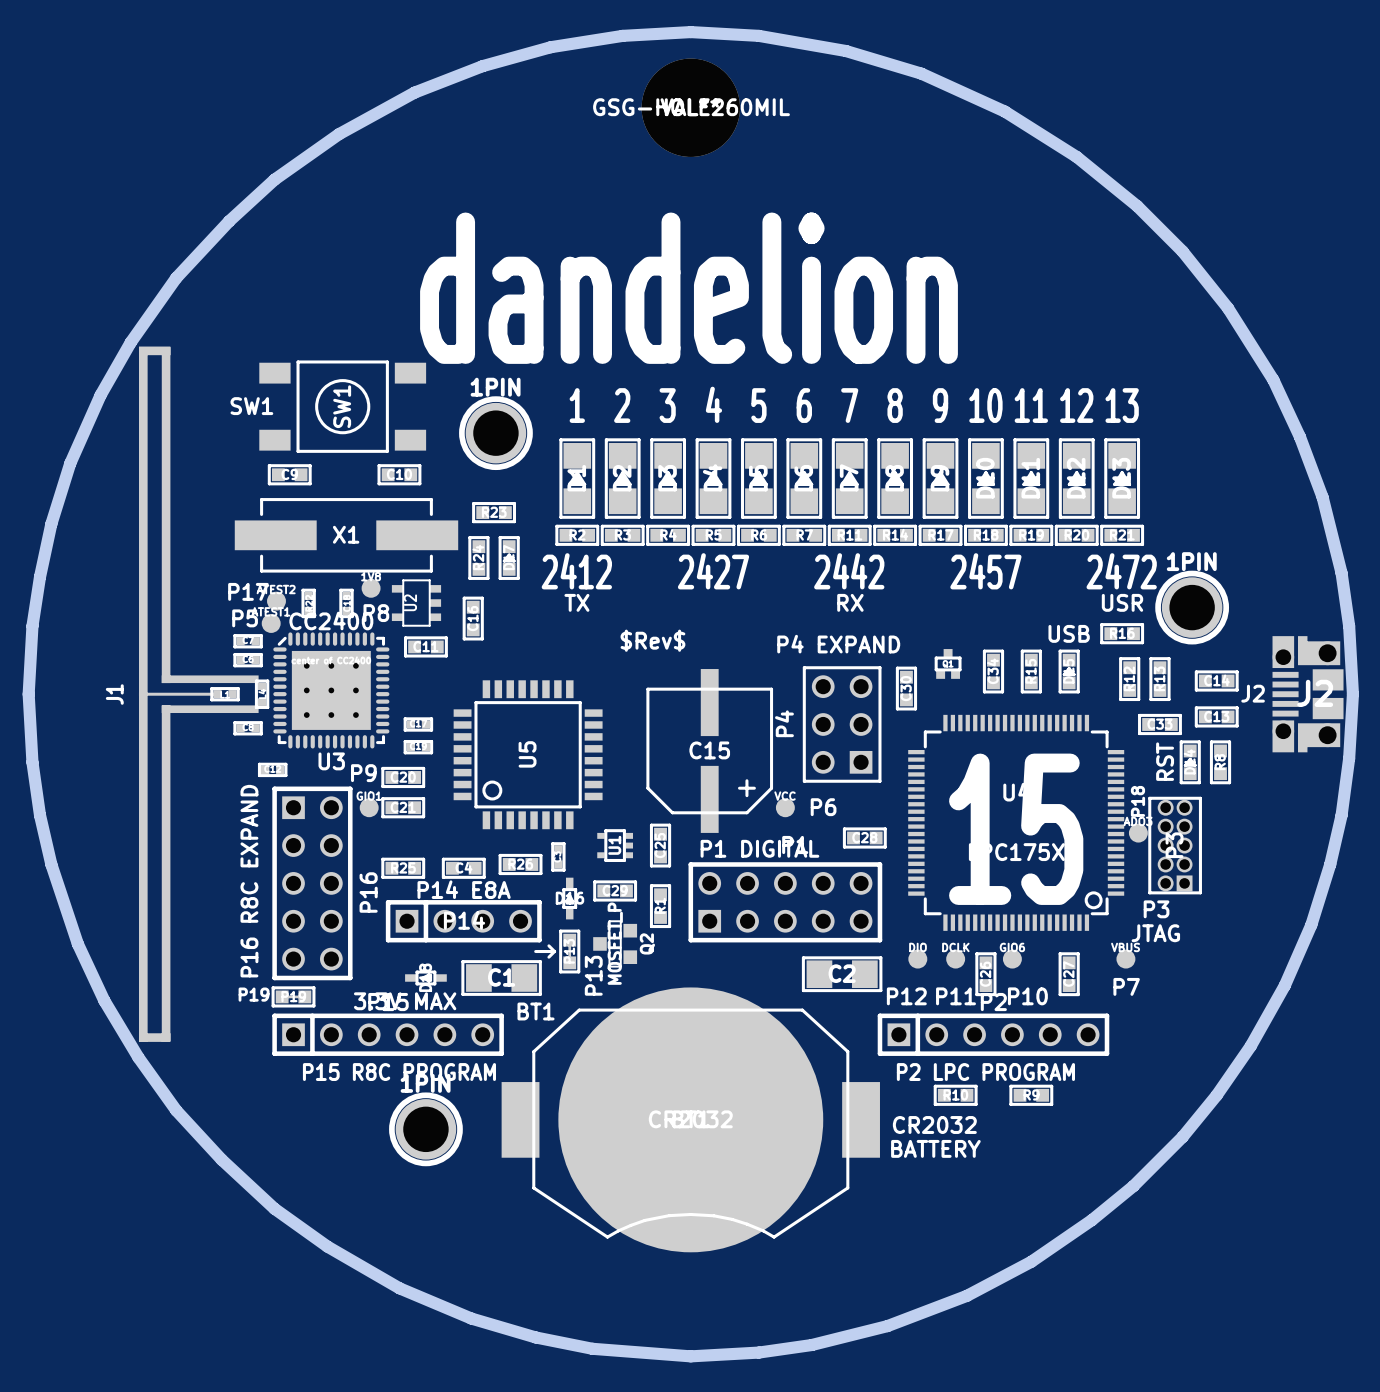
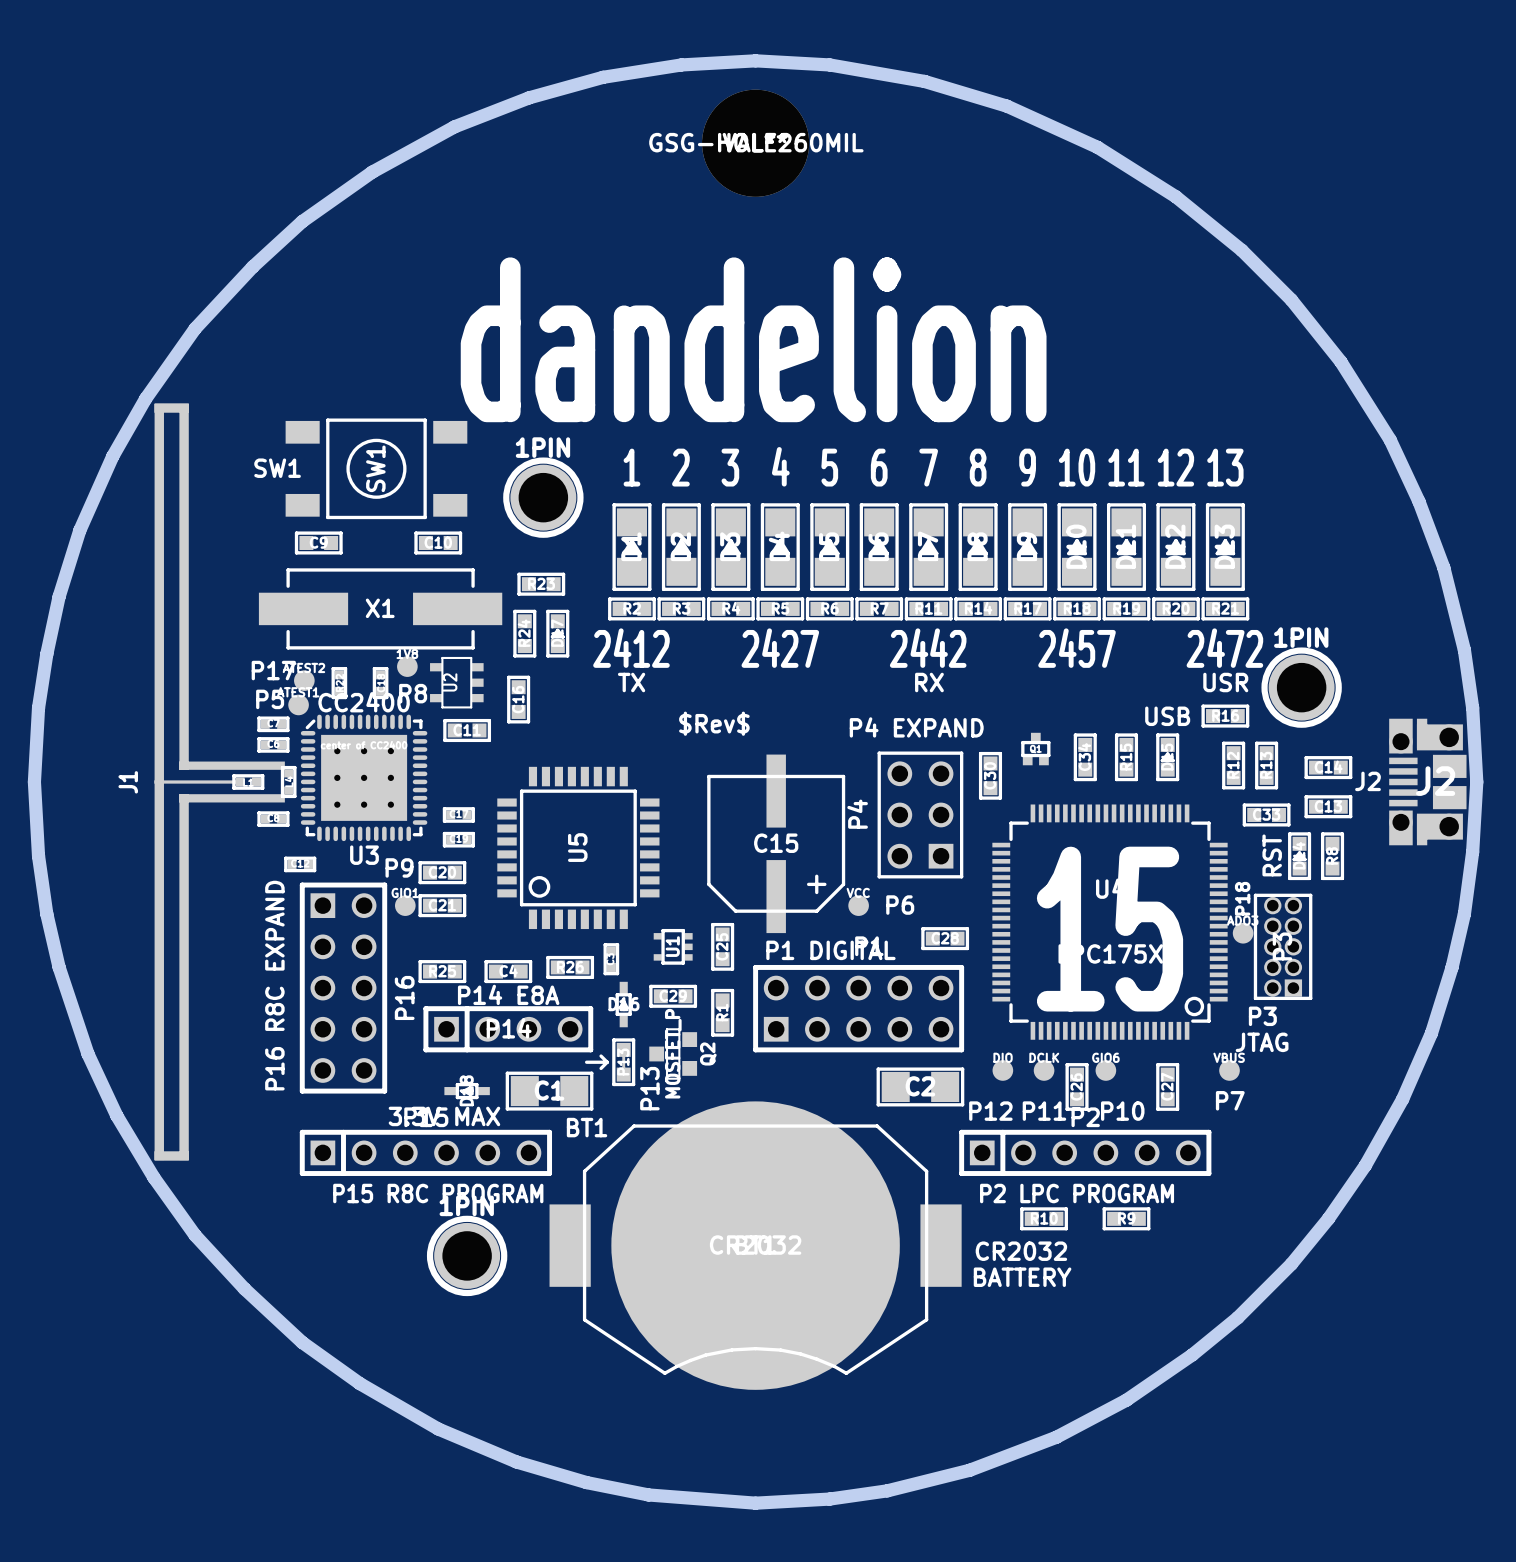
text: P19 (254, 994) -> none
part: (293, 996) -> none

